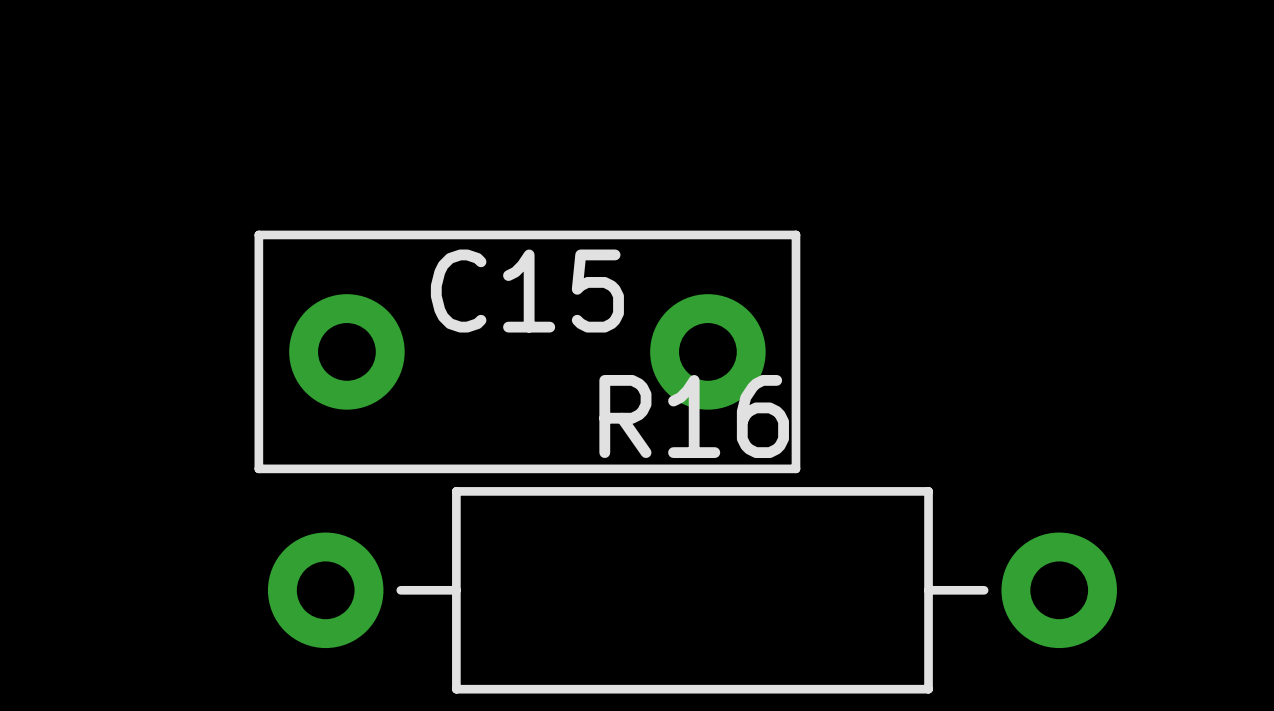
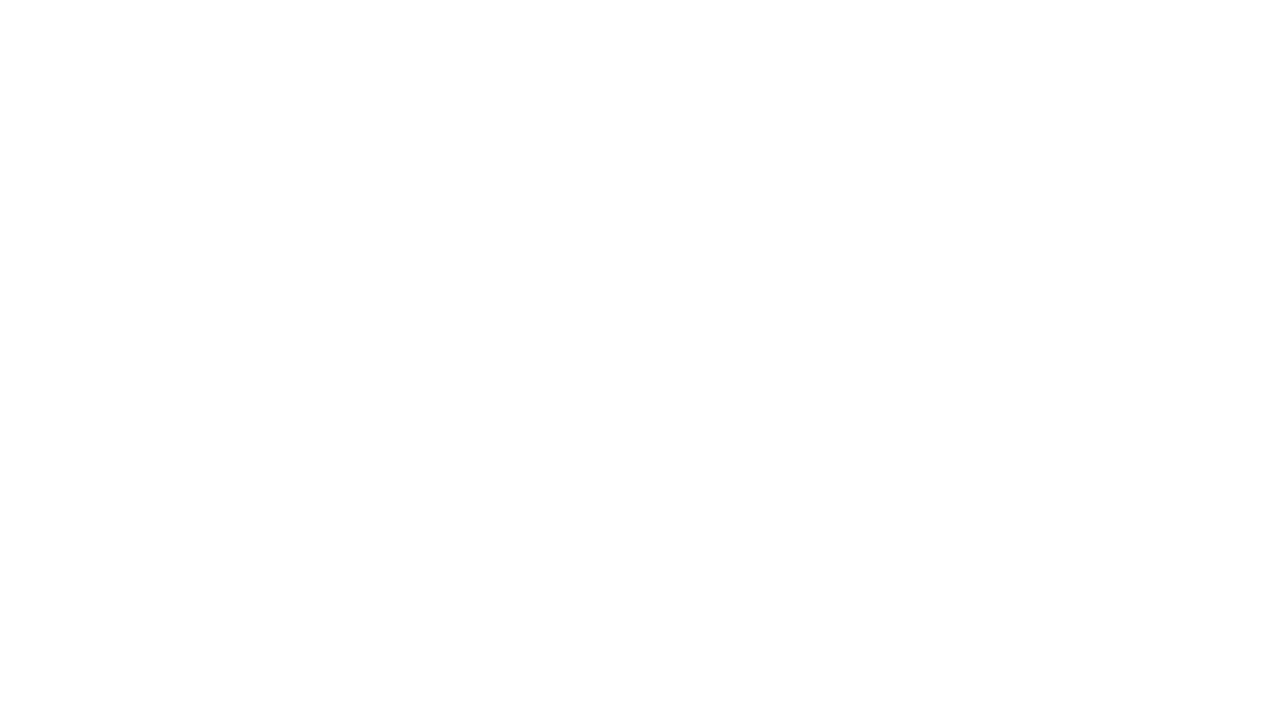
C15: (527, 351) -> none
R16: (692, 590) -> none

